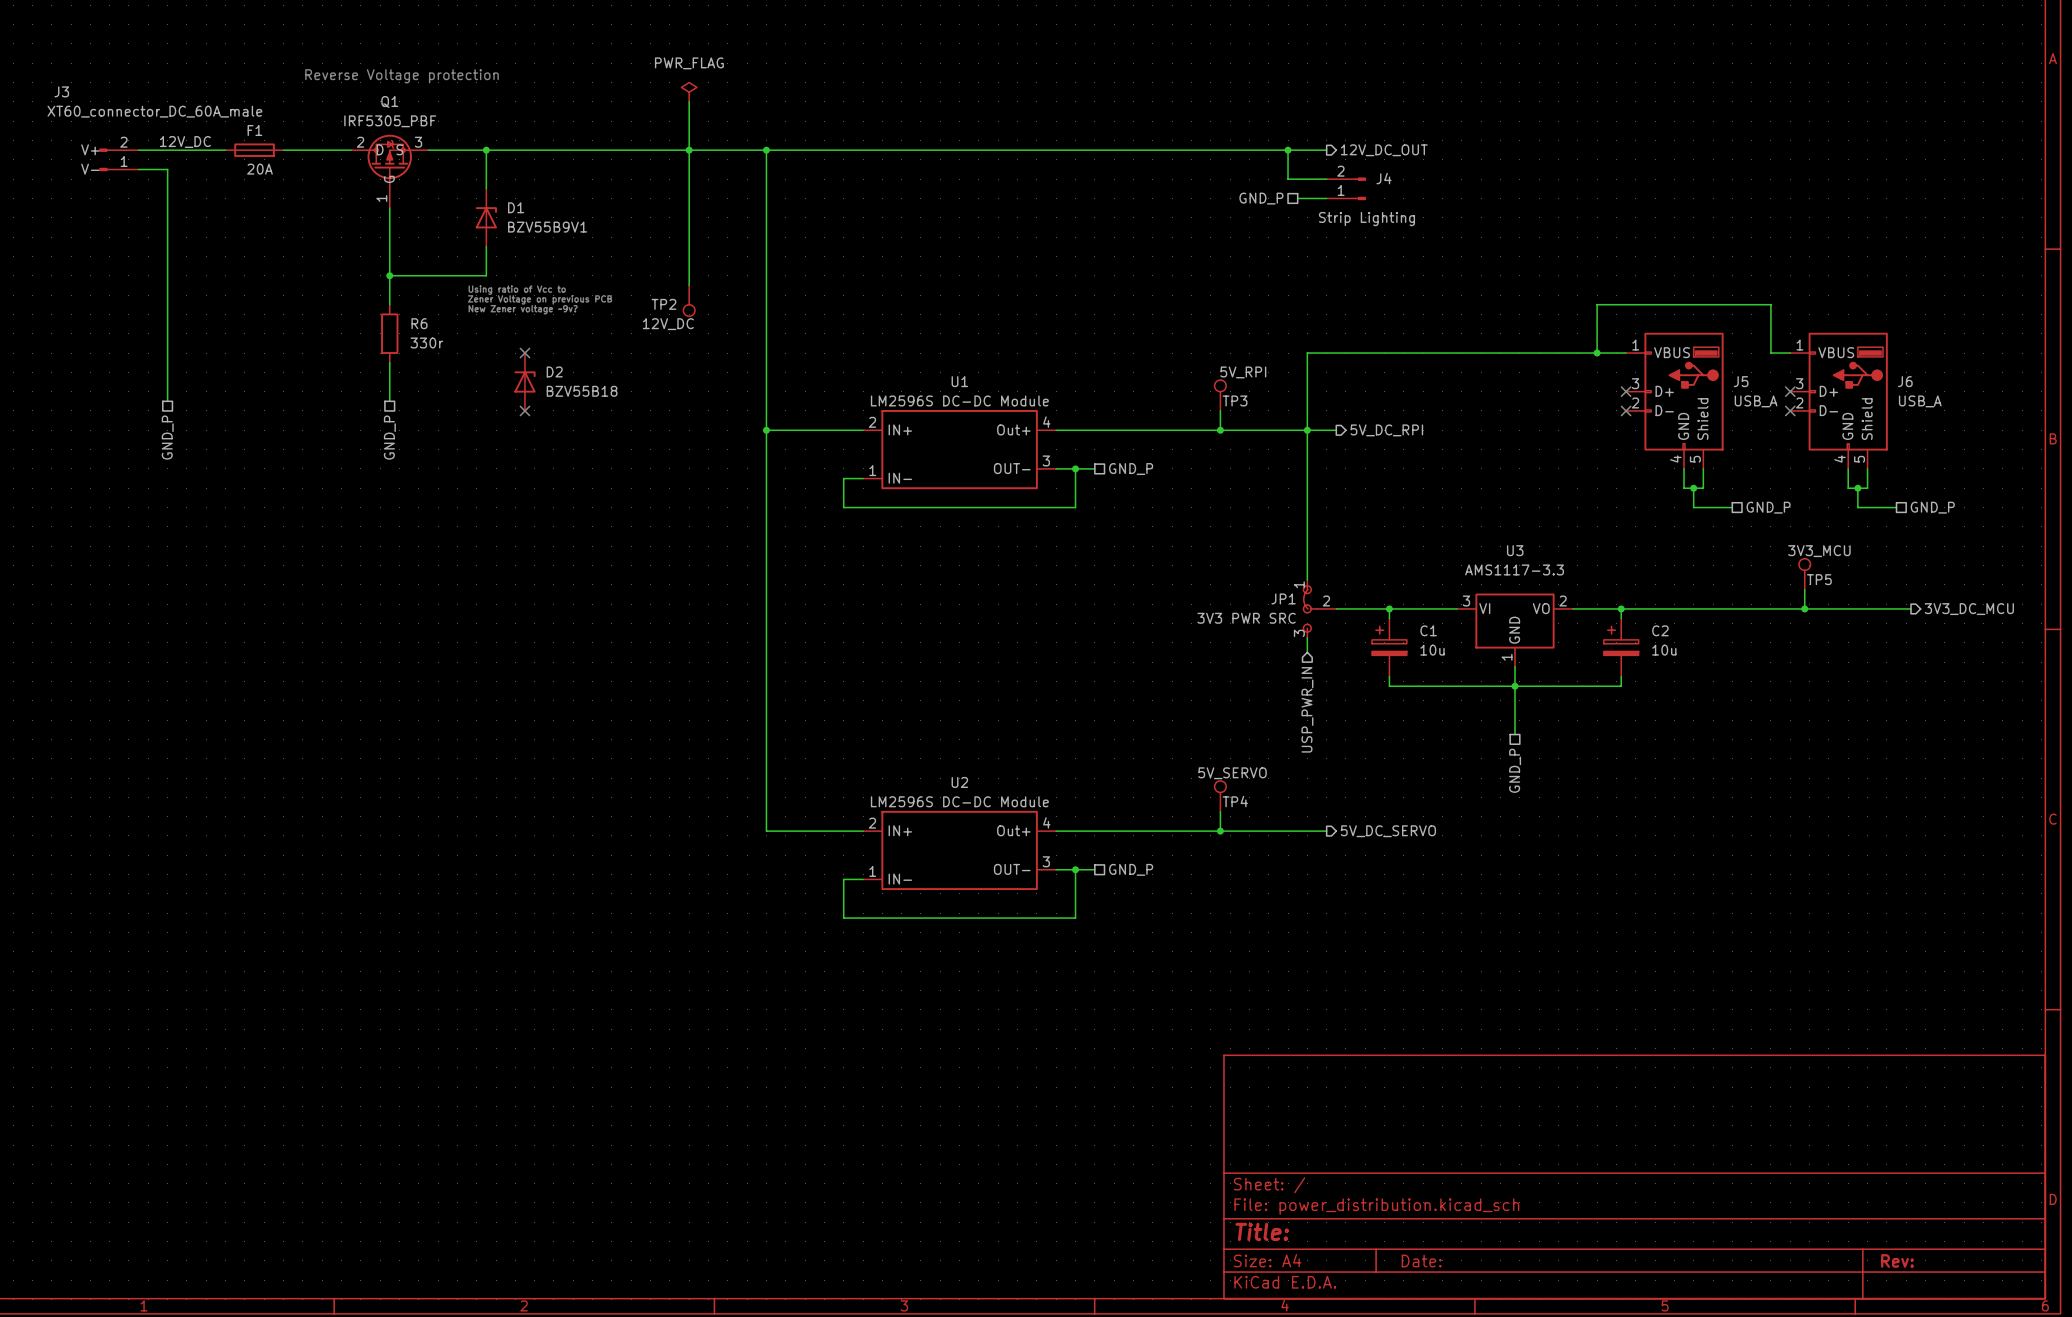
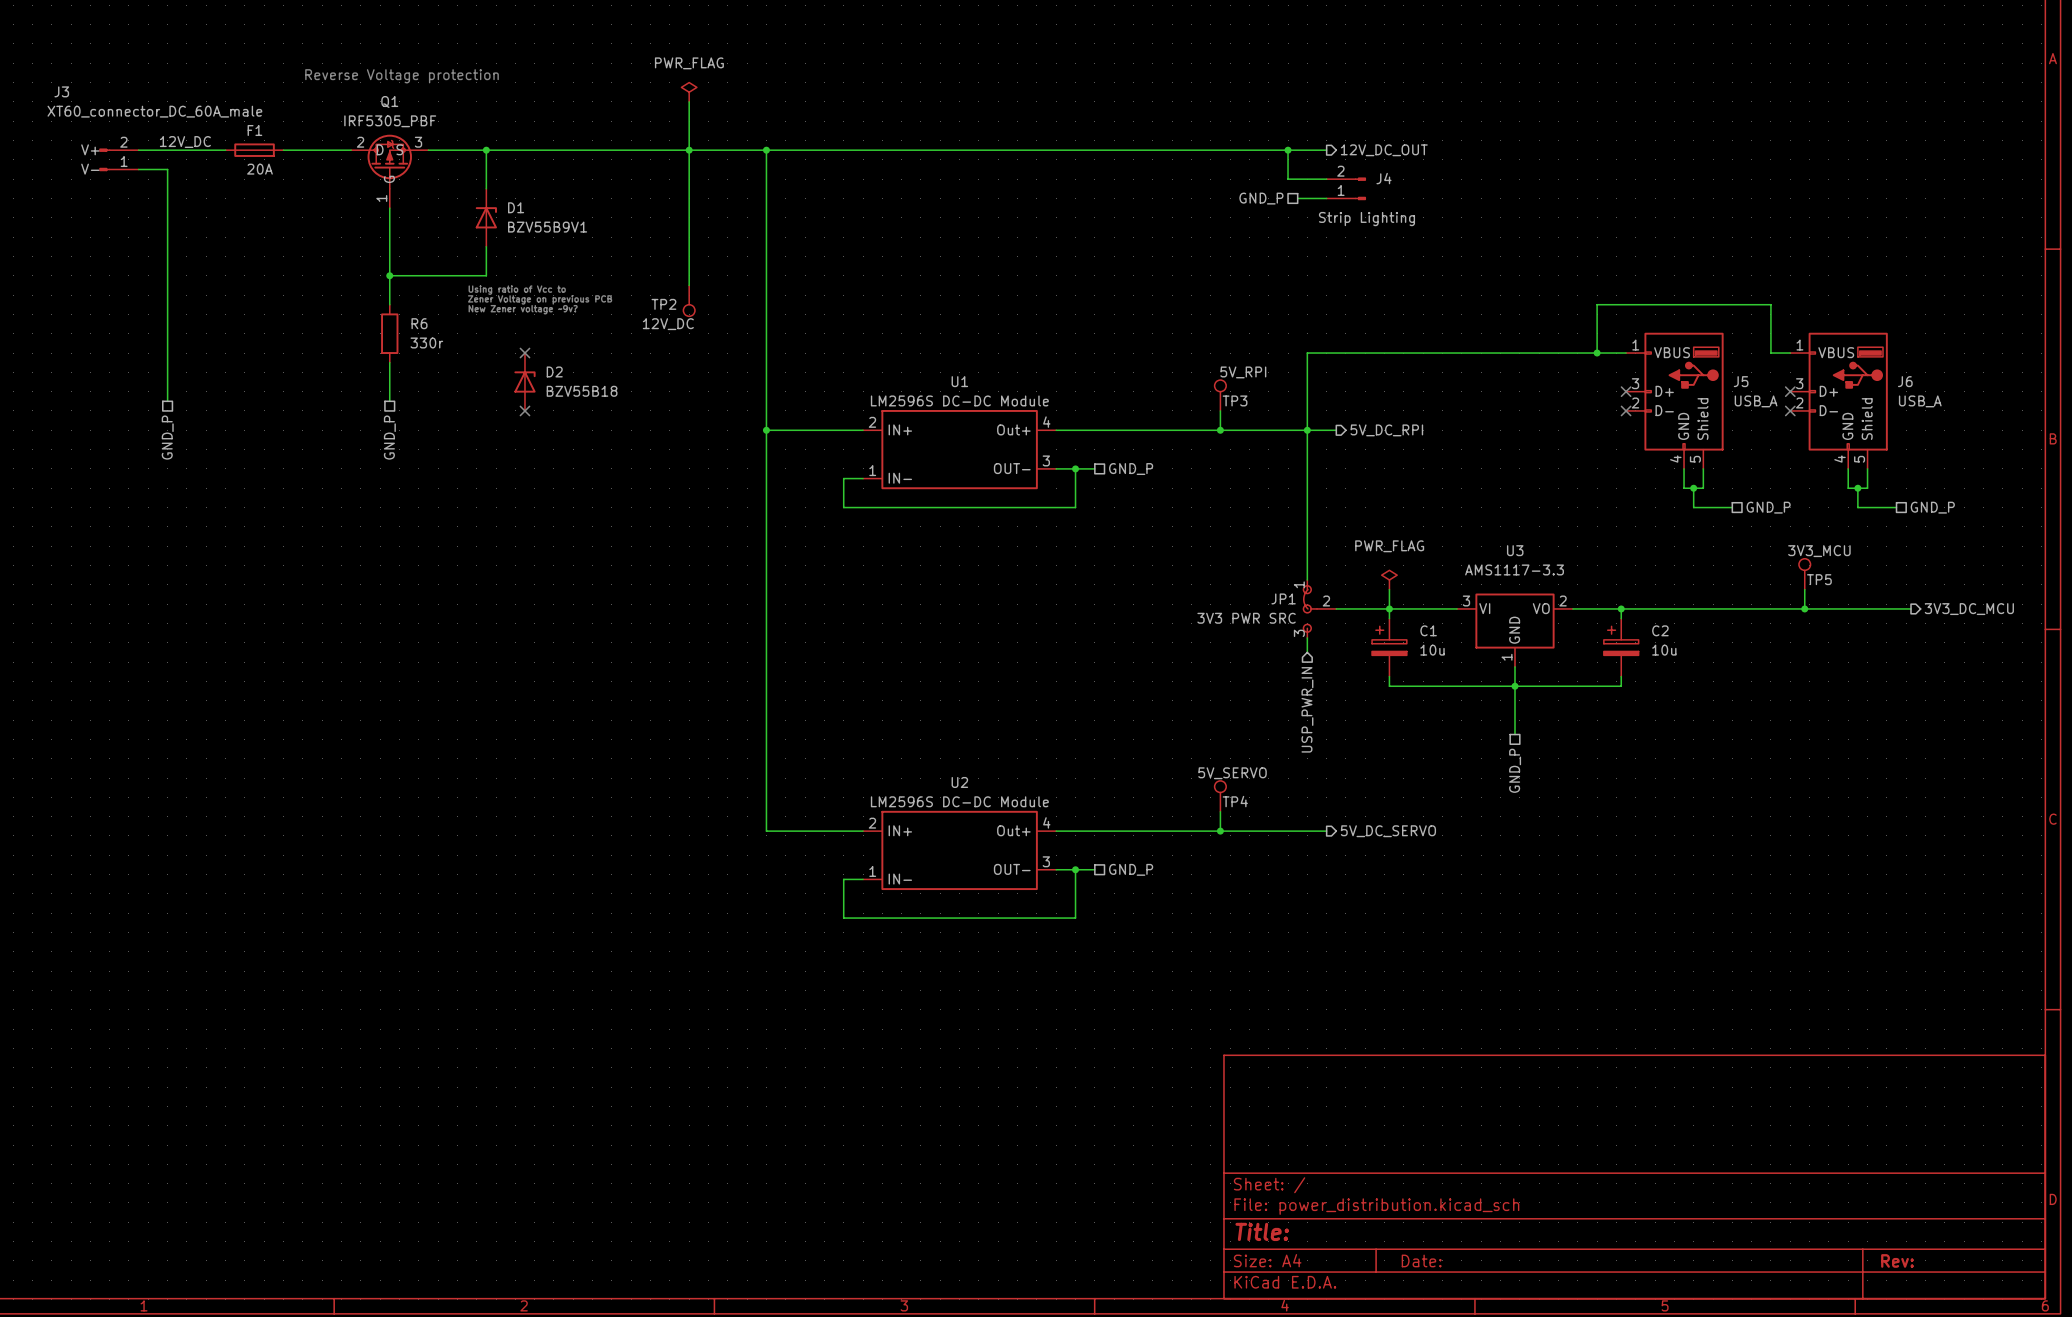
power symbol: none -> PWR_FLAG (1389, 579)
wire: none -> (1389, 589) (1389, 608)

